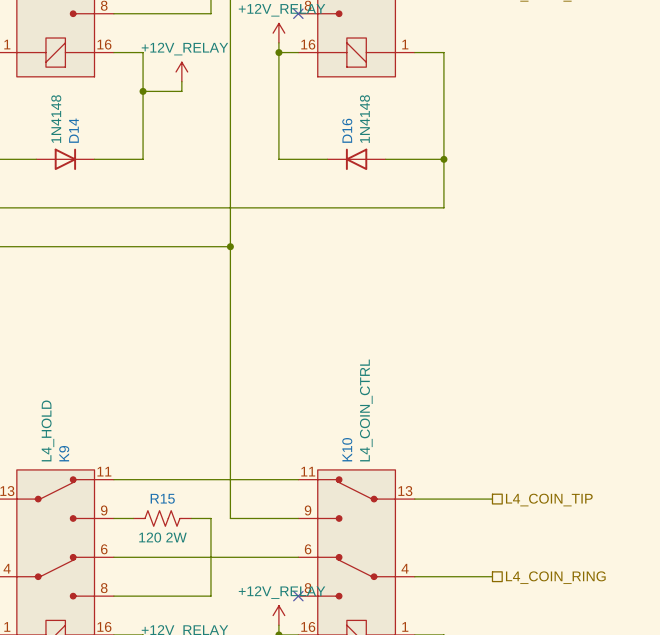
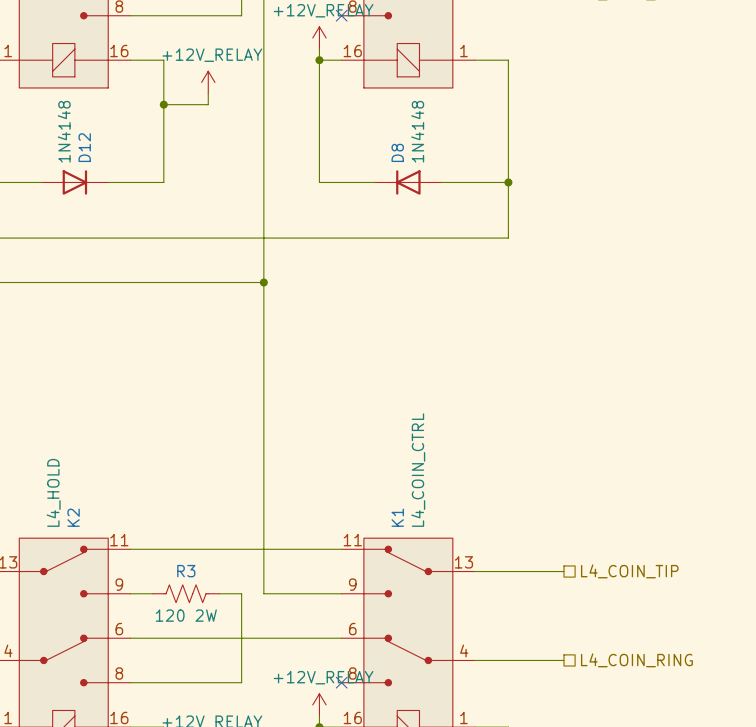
D14 name: D14 (73, 130) -> D12 (84, 147)
D16 name: D16 (347, 130) -> D8 (397, 152)
K10 name: K10 (347, 449) -> K1 (397, 517)
K9 name: K9 (64, 453) -> K2 (73, 517)
R15 name: R15 (162, 498) -> R3 (186, 571)

